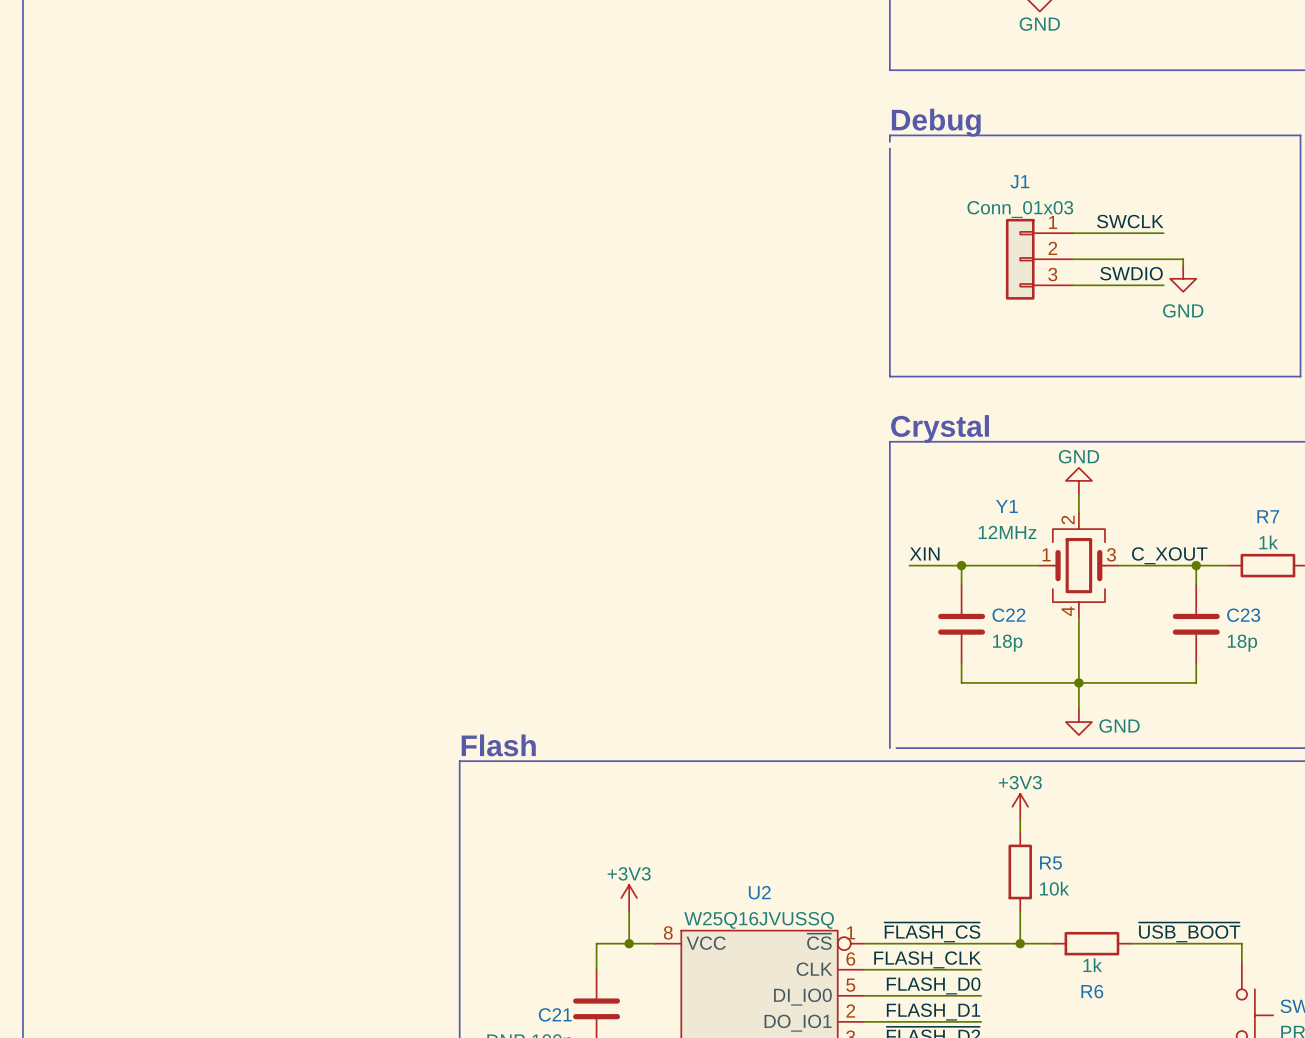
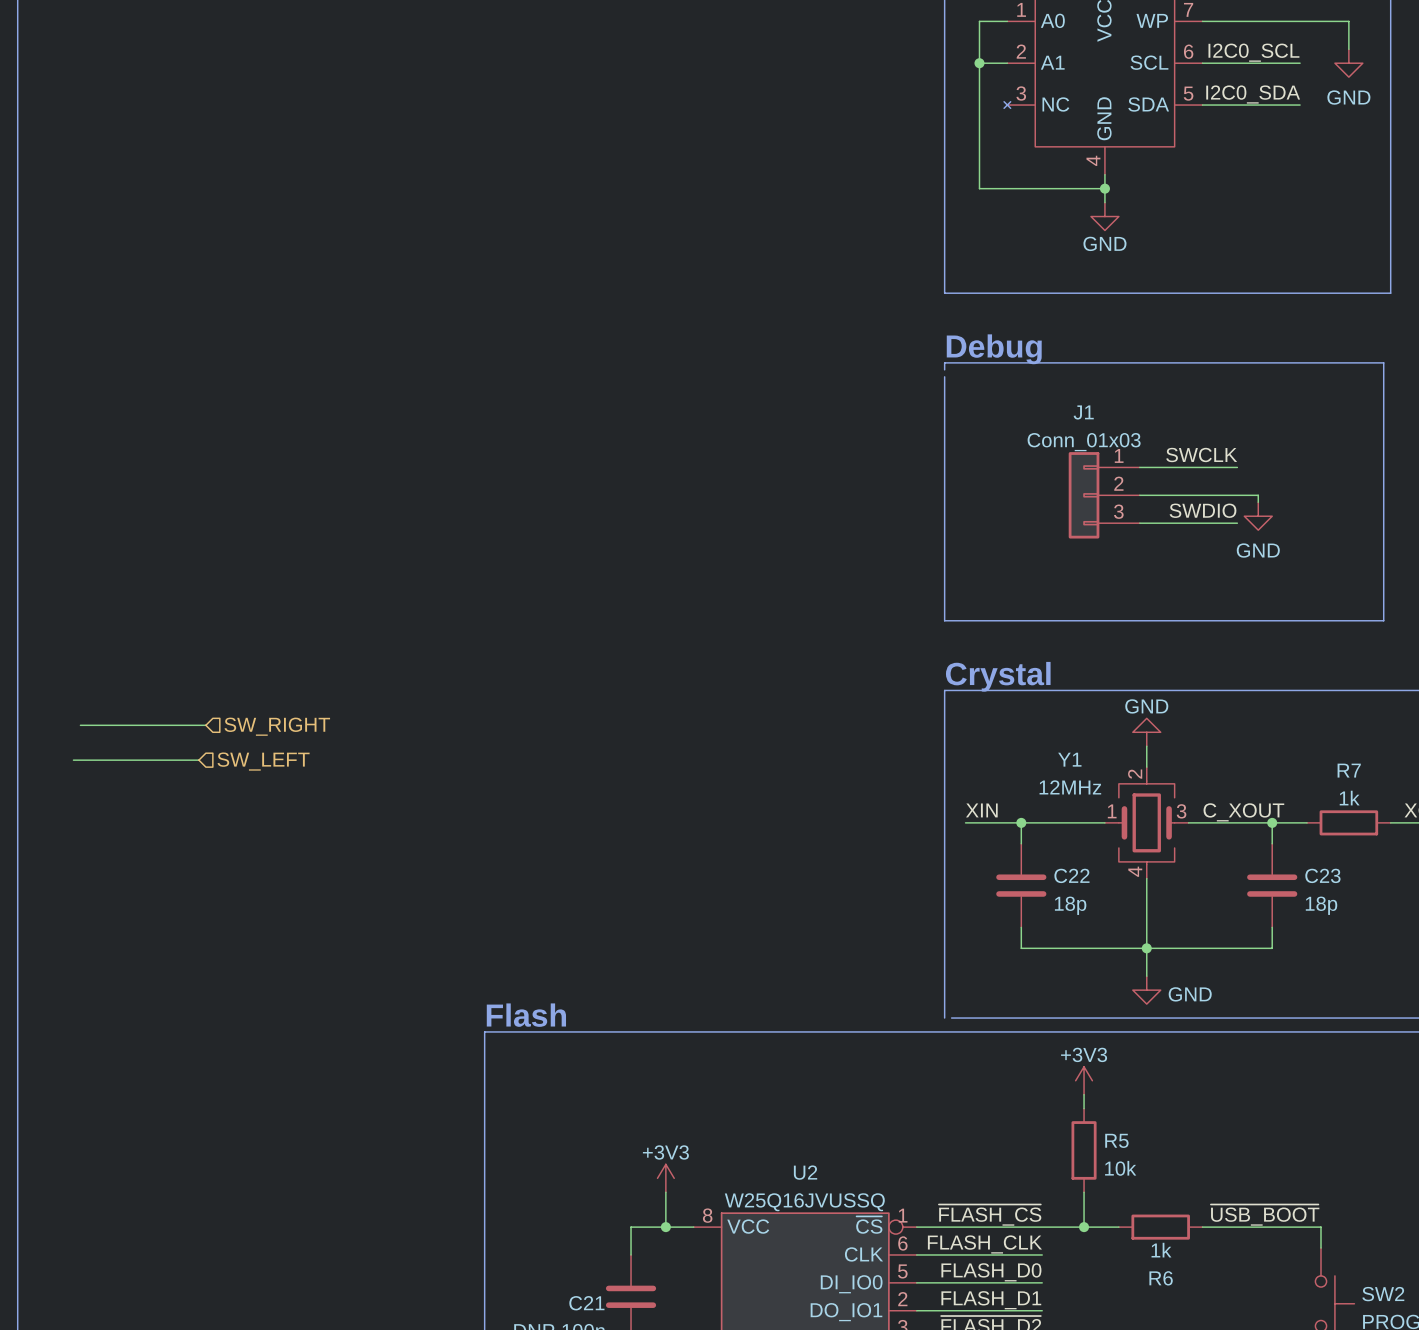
wire: none -> (80, 725) (205, 725)
hierarchical label: none -> SW_RIGHT (277, 726)
wire: none -> (73, 760) (198, 760)
hierarchical label: none -> SW_LEFT (263, 761)

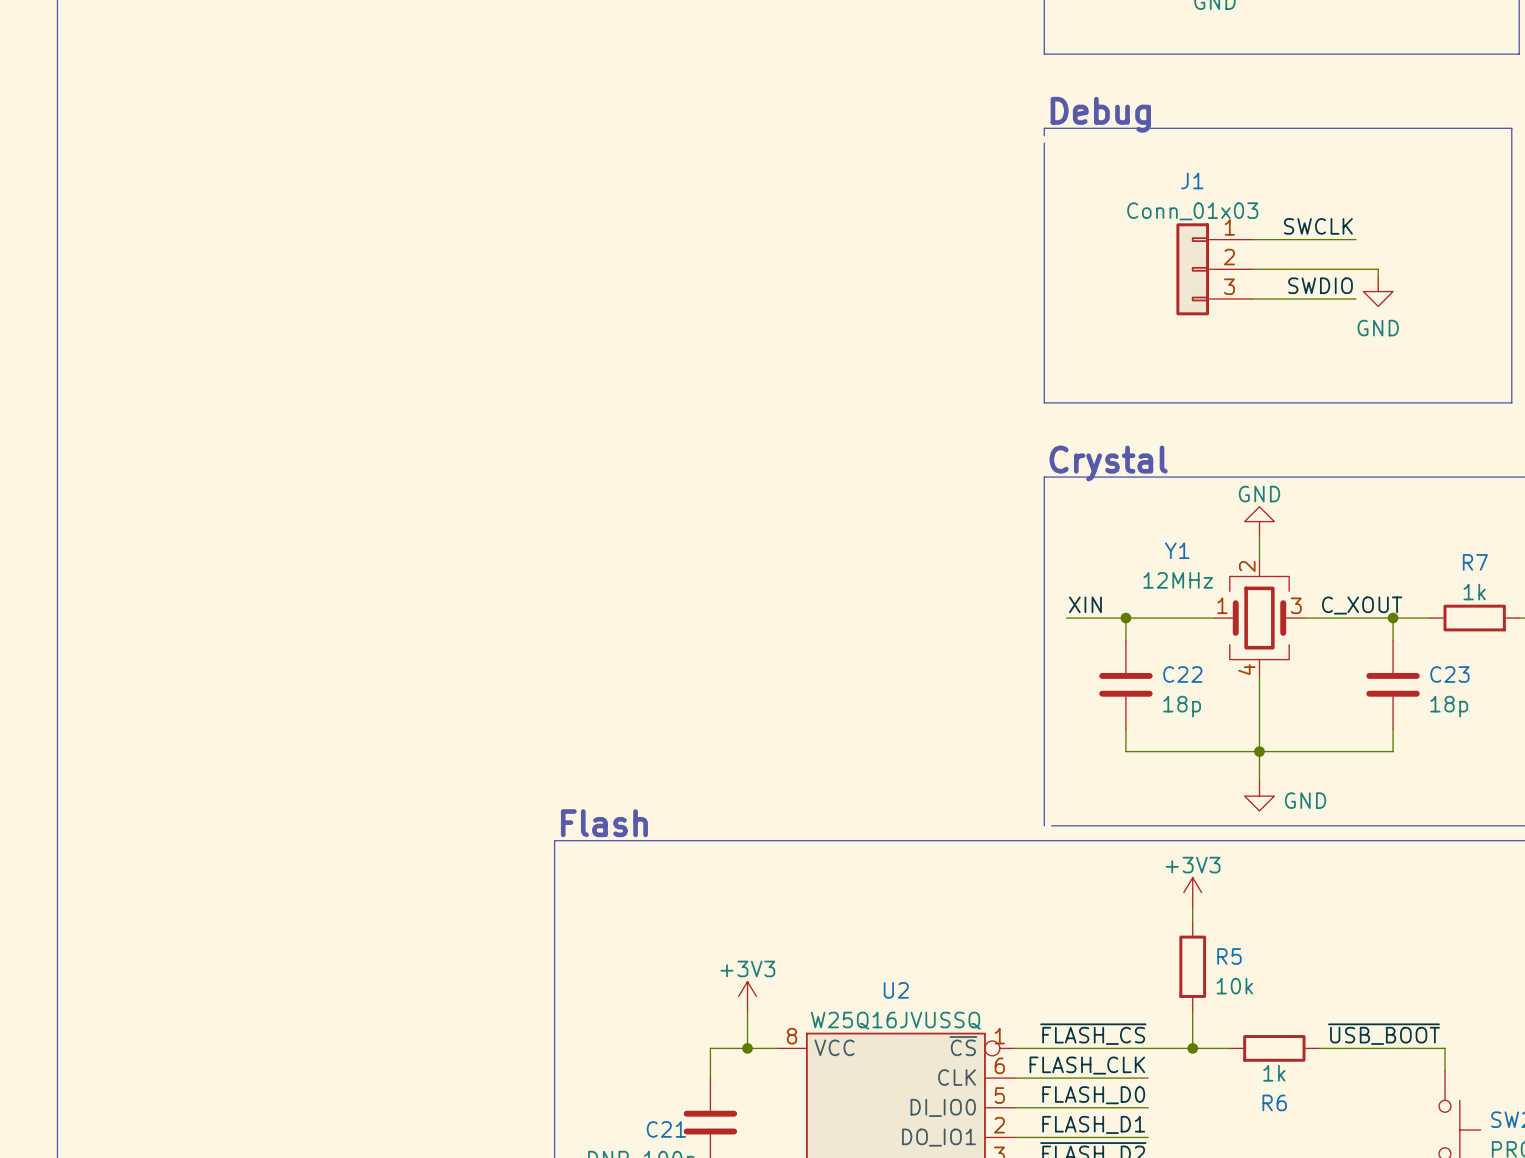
wire: (80, 725) (205, 725) -> none
hierarchical label: SW_RIGHT (277, 726) -> none
wire: (73, 760) (198, 760) -> none
hierarchical label: SW_LEFT (263, 761) -> none

